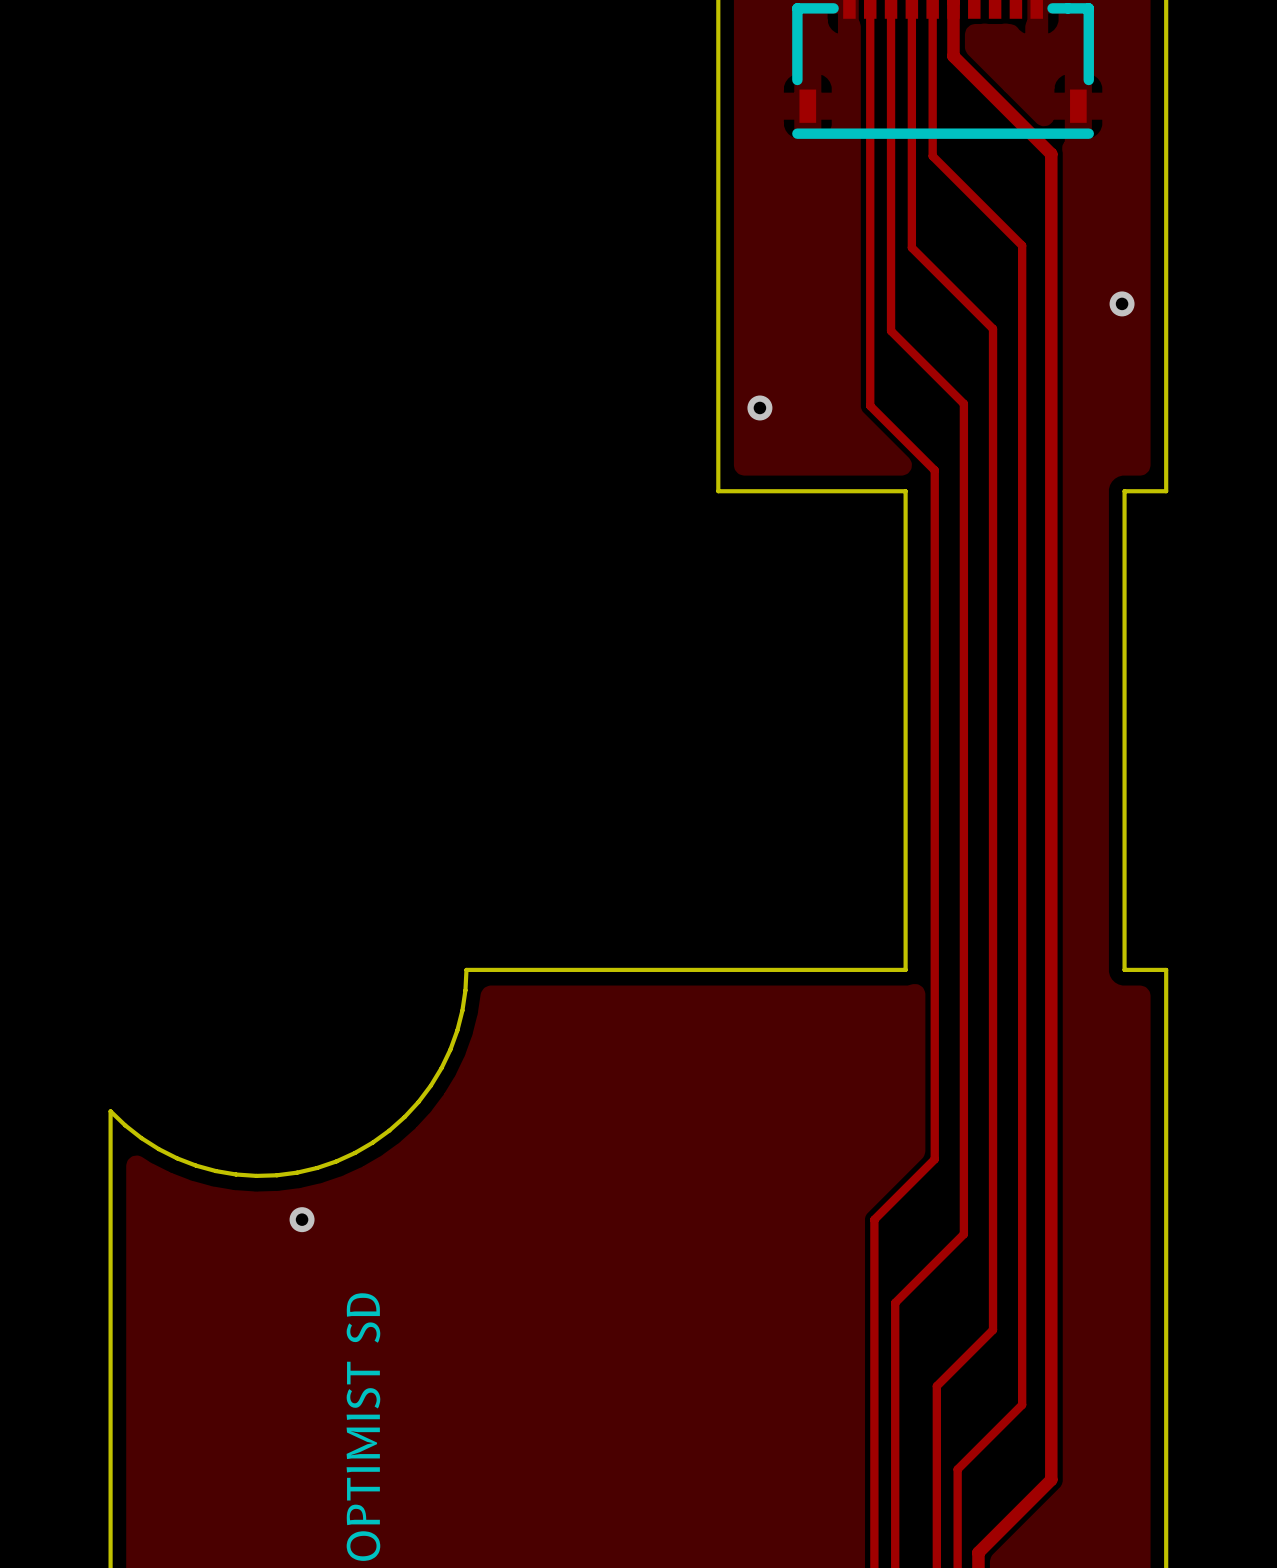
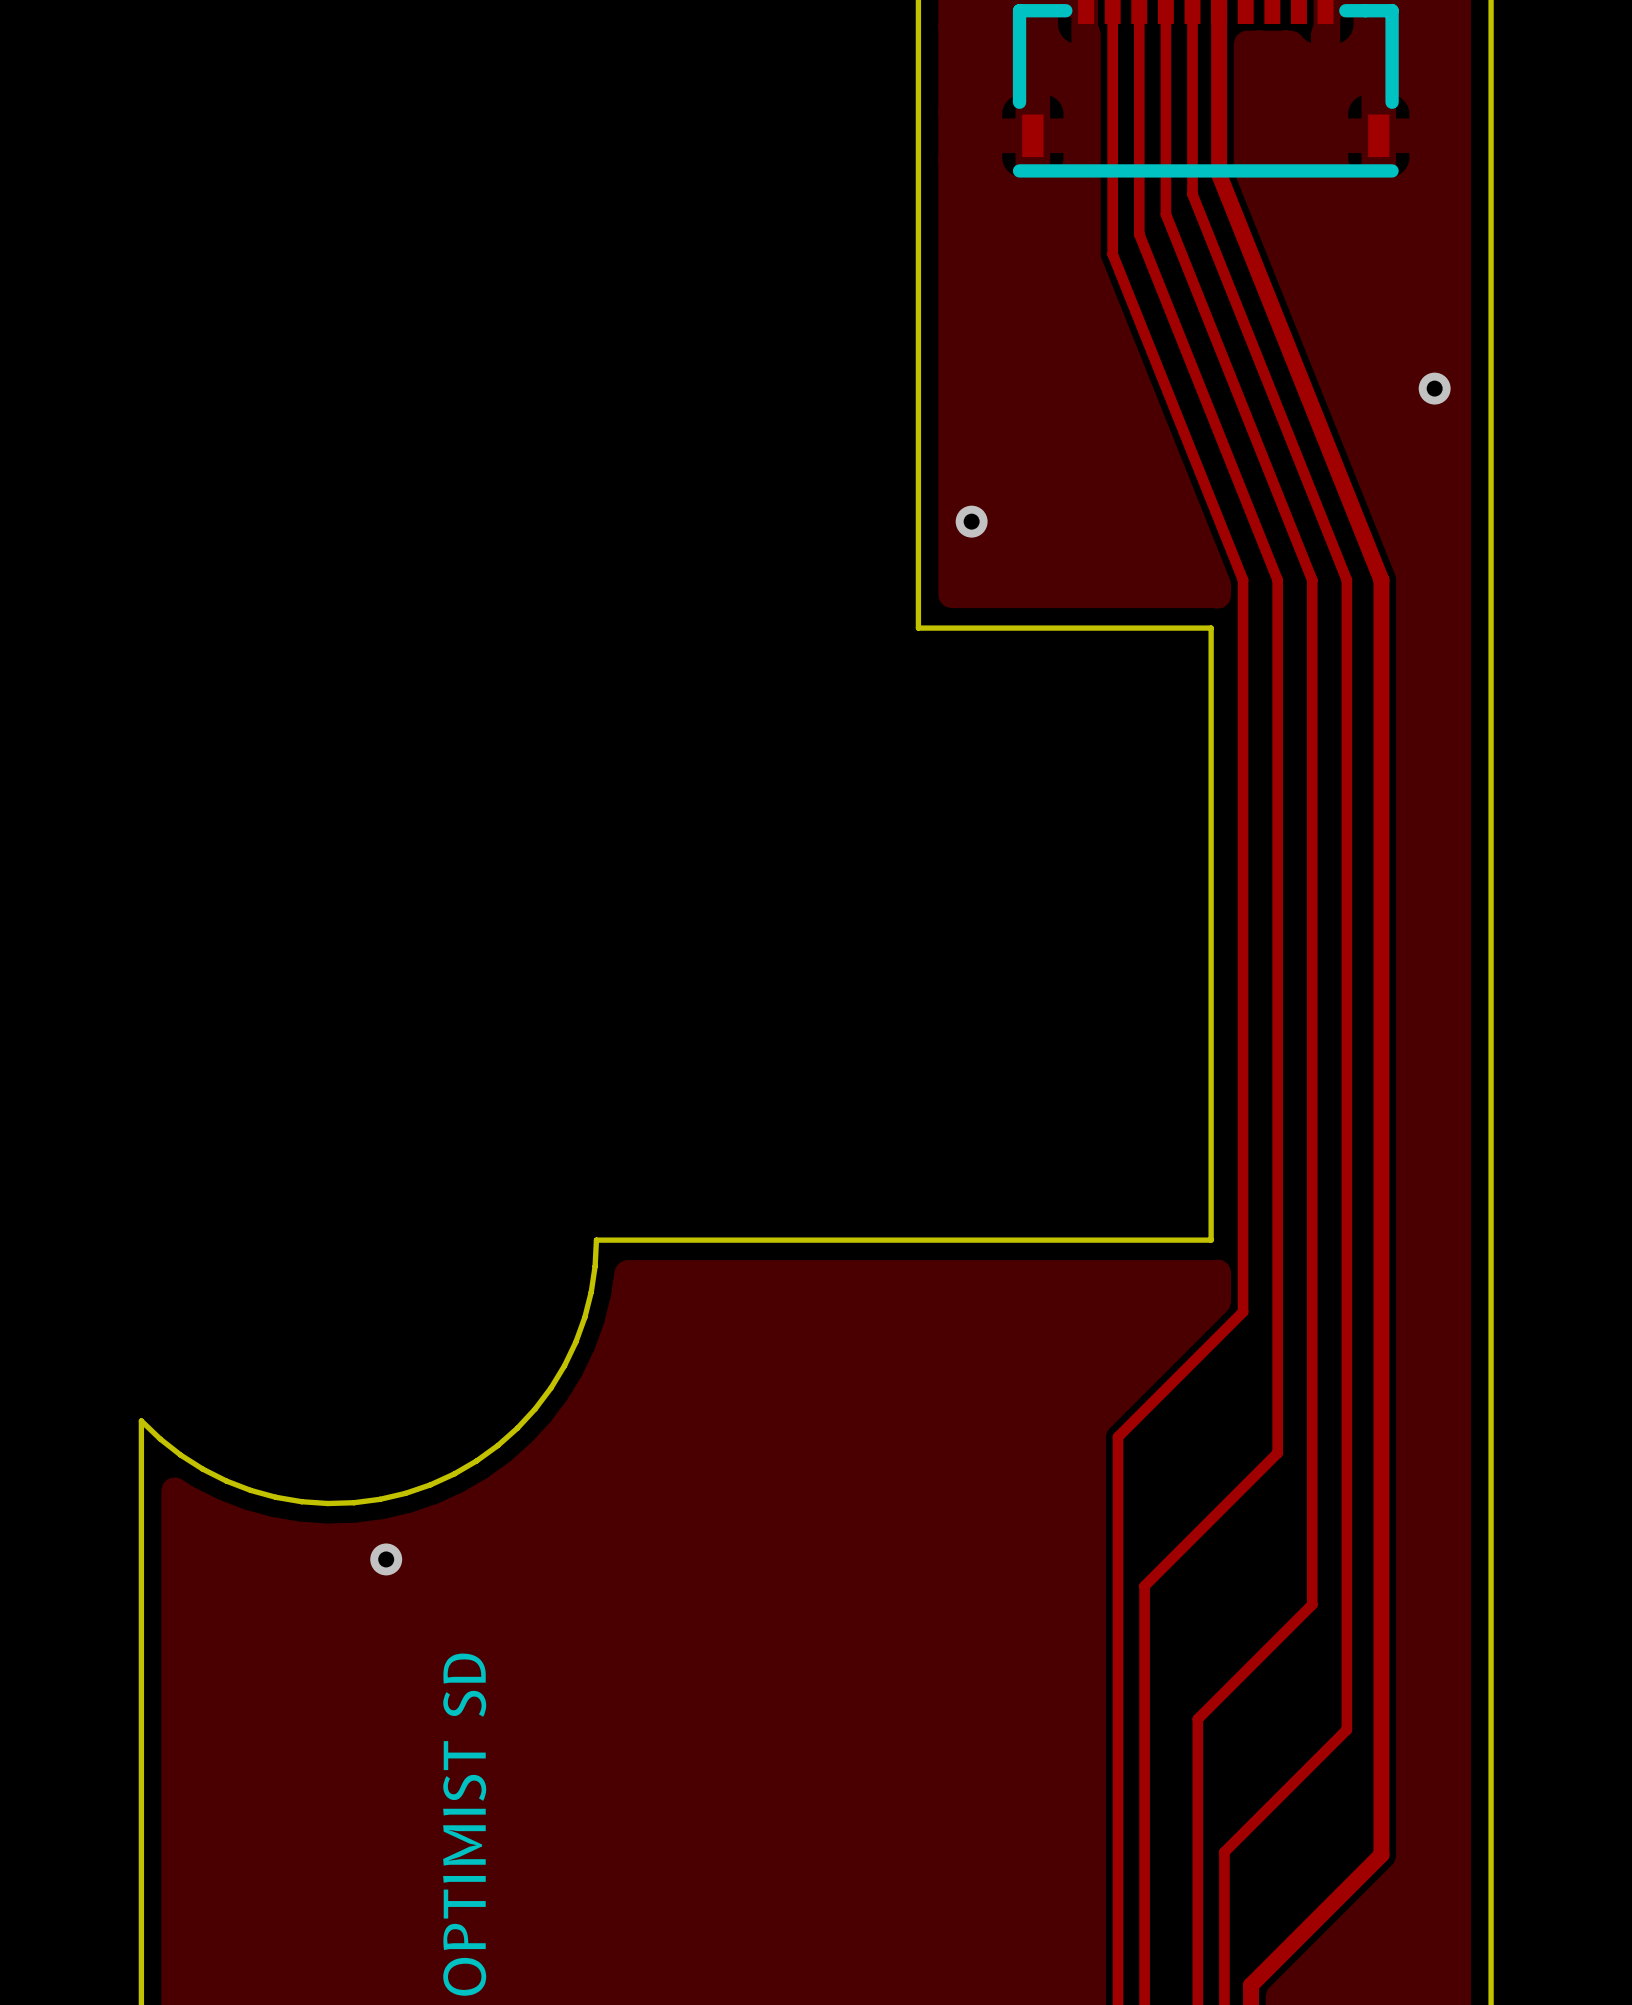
track: (953, 56) (1051, 154) (1051, 1479) -> (1219, 71) (1219, 174) (1381, 580) (1381, 1854) (1344, 1892)
track: (932, 151) (932, 156) (1022, 245) (1022, 1404) (957, 1469) -> (1192, 194) (1346, 580) (1346, 1729) (1224, 1852) (1224, 1878)
track: (911, 167) (911, 247) (993, 328) (993, 1329) (936, 1386) -> (1165, 214) (1312, 580) (1312, 1604) (1197, 1719) (1197, 1772)
track: (891, 183) (891, 330) (963, 403) (963, 1234) (895, 1302) -> (1139, 234) (1277, 580) (1277, 1453) (1144, 1586) (1144, 1665)
track: (870, 198) (870, 405) (934, 470) (934, 1159) (874, 1219) -> (1112, 254) (1243, 580) (1243, 1311) (1117, 1437) (1117, 1559)
board edge: (905, 491) (905, 969) -> (1157, 628) (1211, 628) (1211, 1240) (1157, 1240)
board edge: (1166, 491) (1124, 491) (1124, 969) (1166, 969) -> (1491, 628) (1491, 1240)

